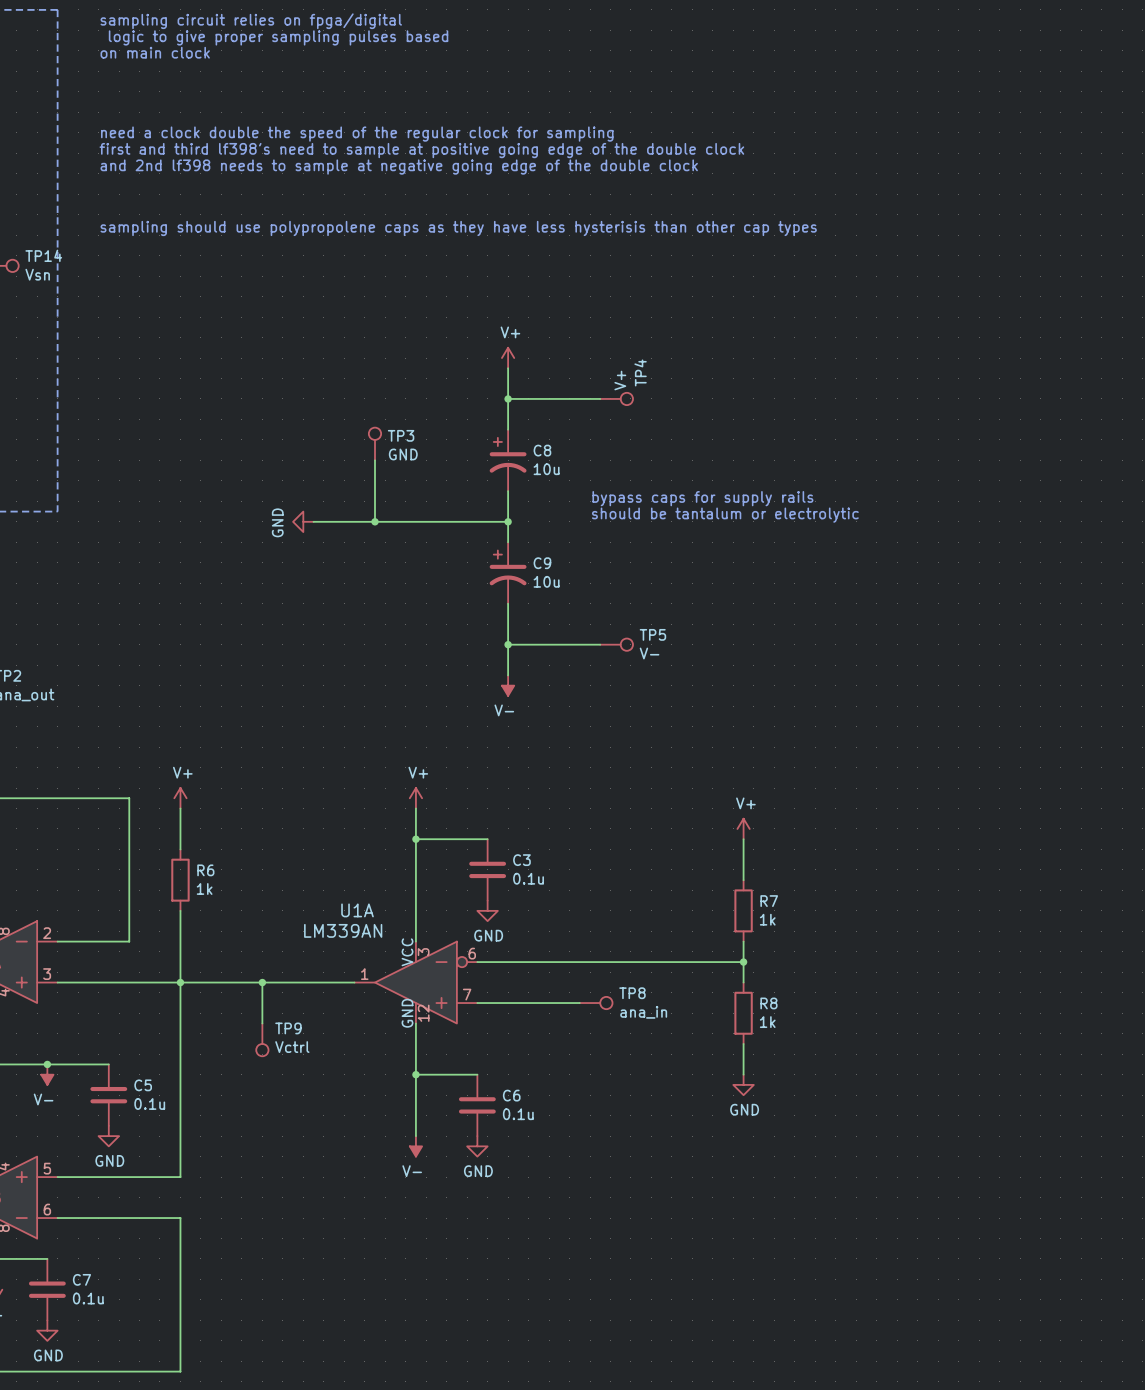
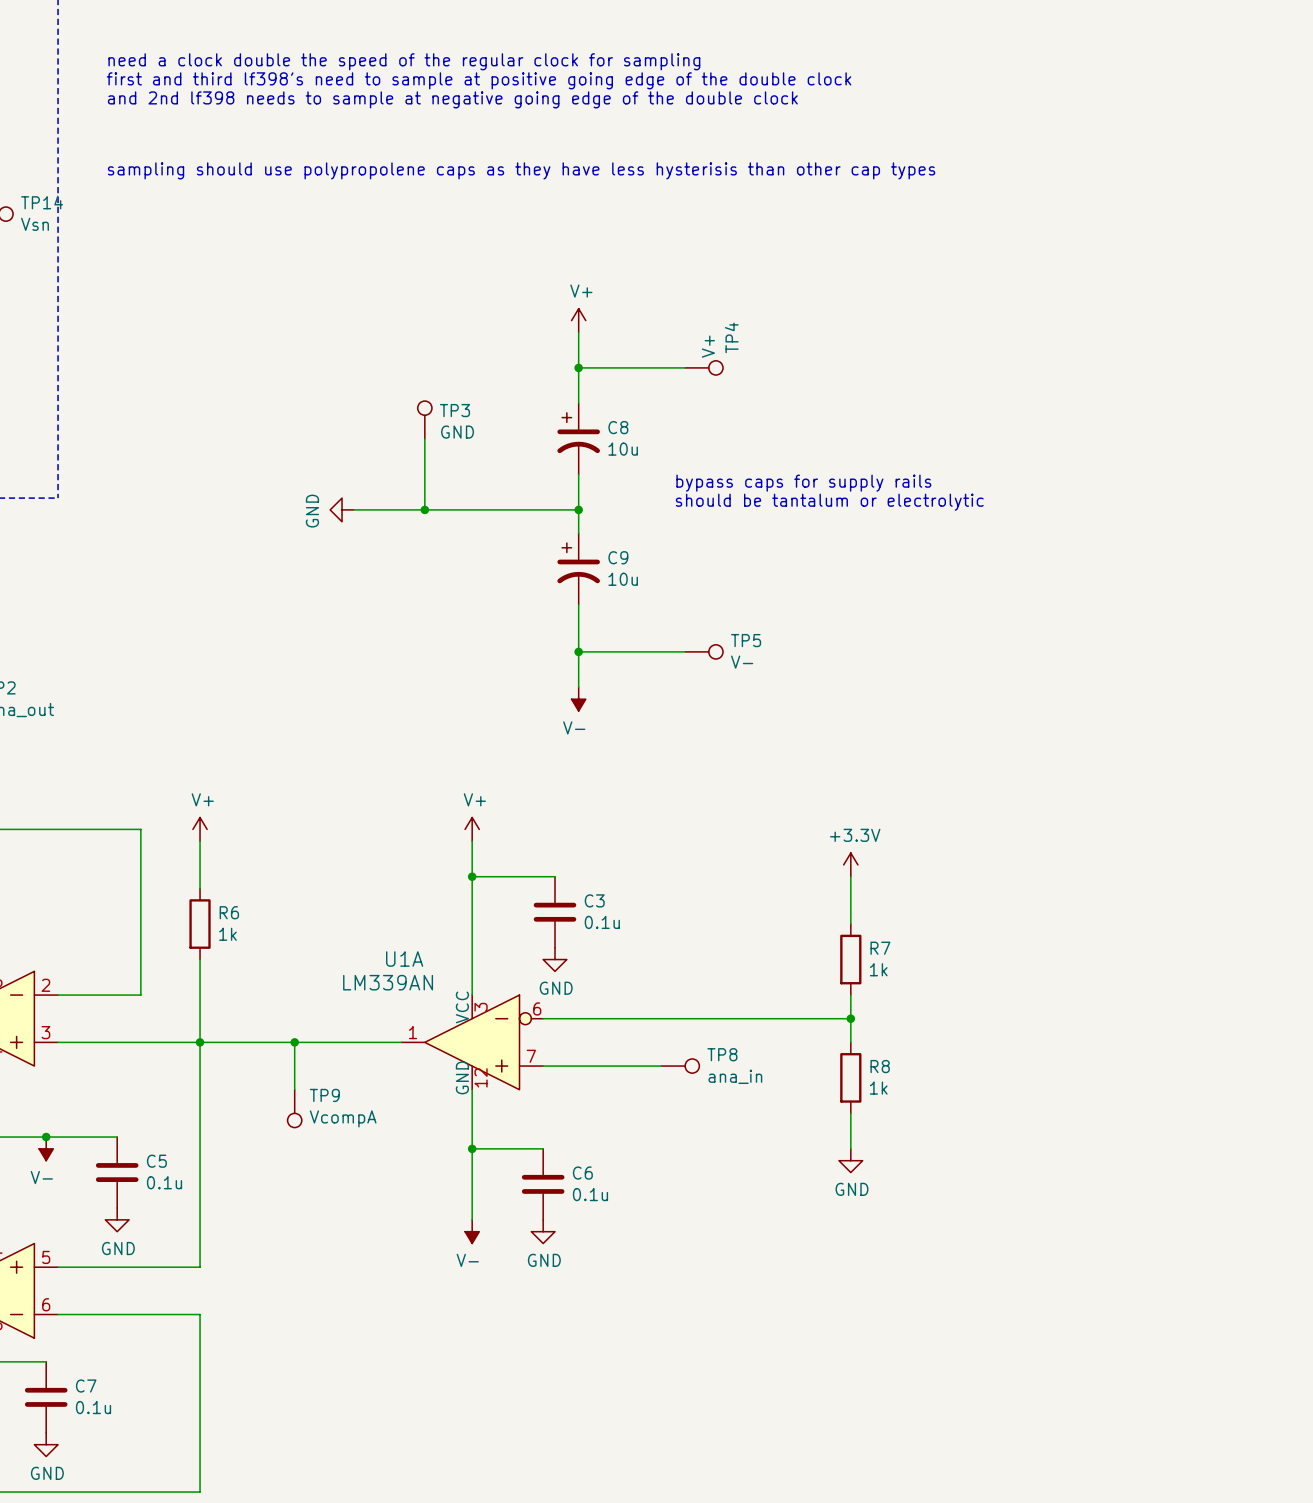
power symbol: V+ (743, 828) -> +3.3V (850, 864)
TP9 value: Vctrl (292, 1047) -> VcompA (343, 1118)

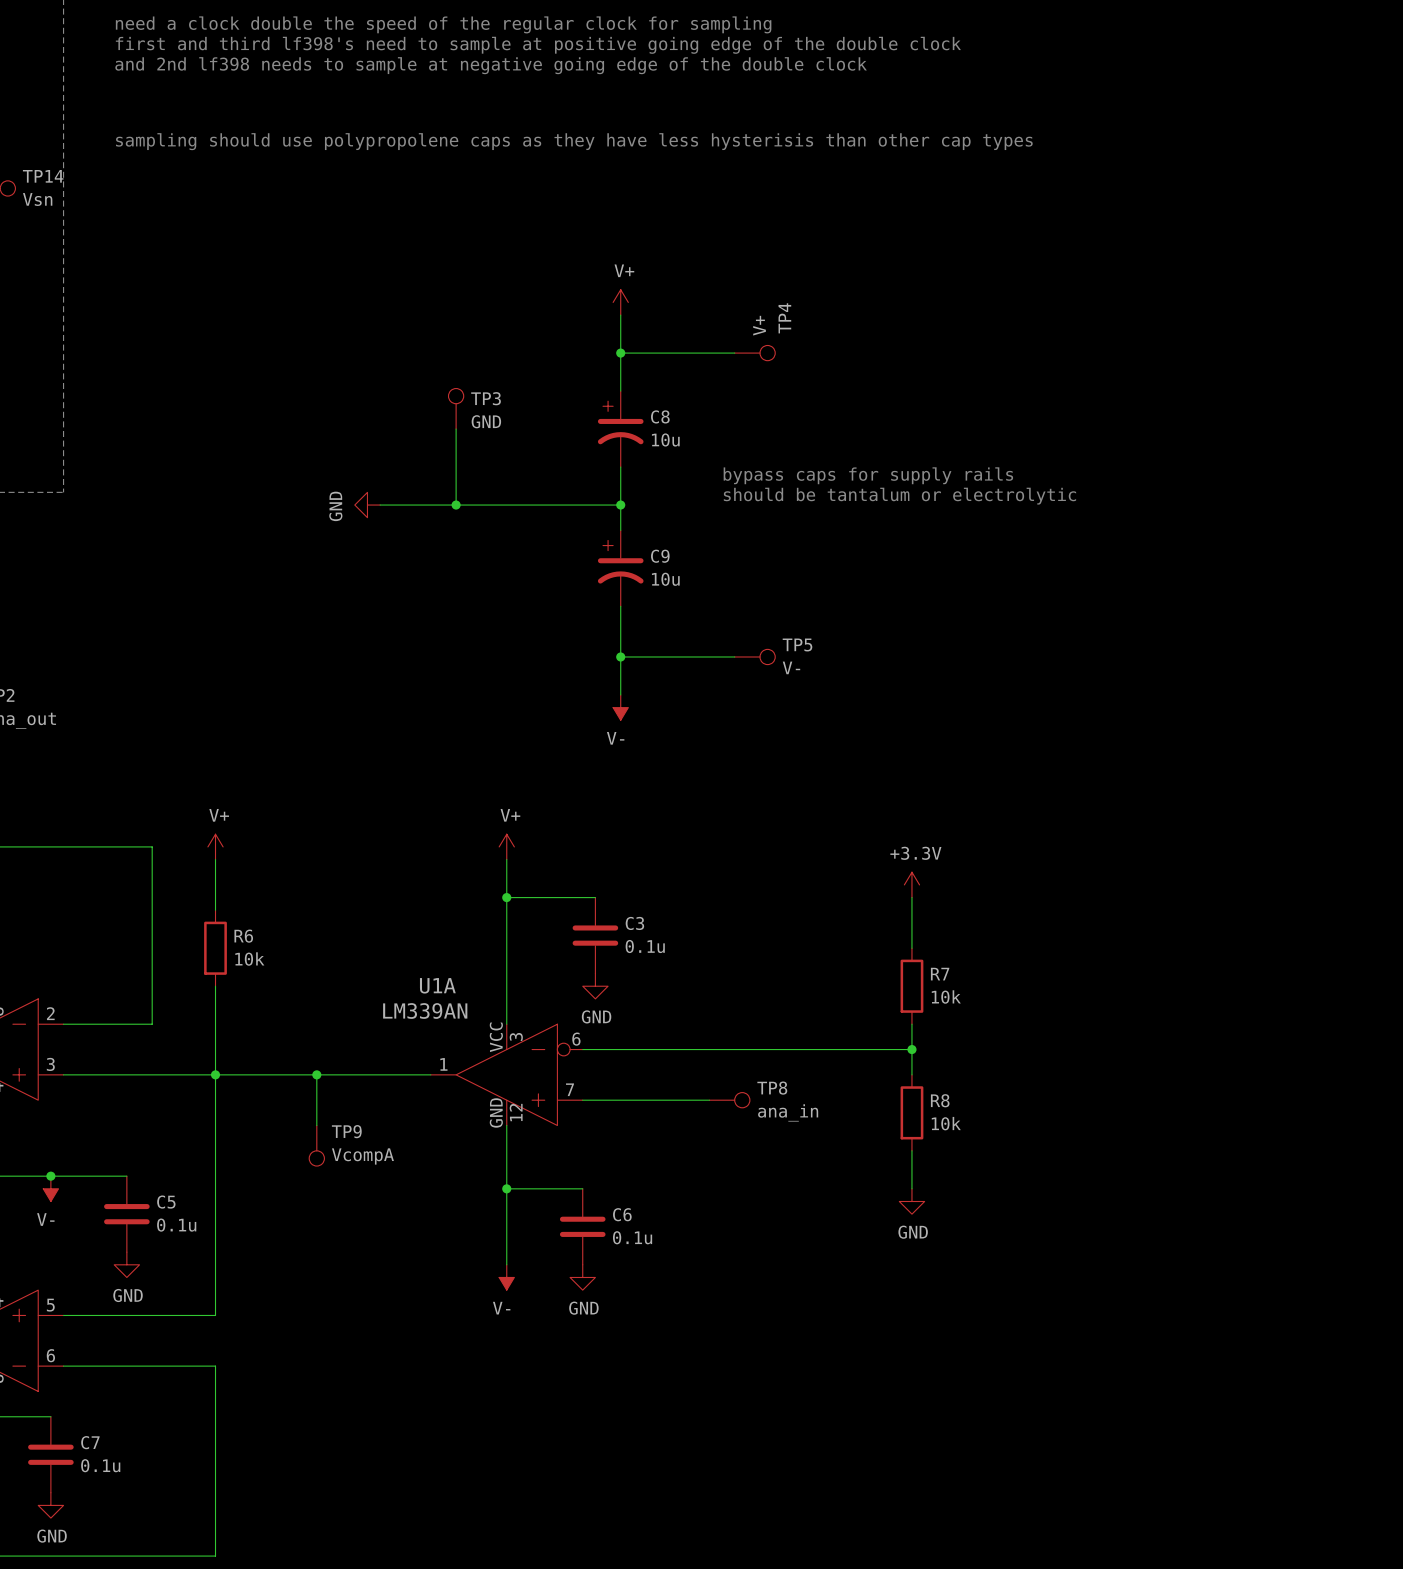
R6 value: 1k (227, 934) -> 10k (249, 959)
R7 value: 1k (878, 969) -> 10k (946, 997)
R8 value: 1k (878, 1088) -> 10k (946, 1123)

